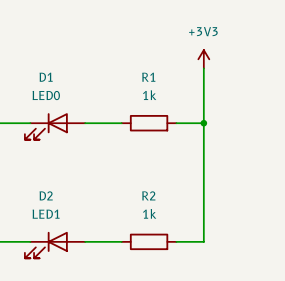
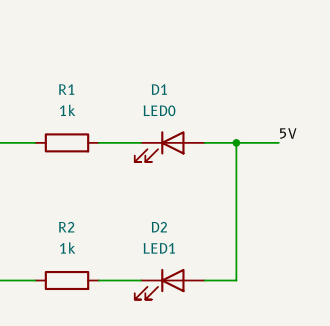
power symbol: +3V3 (203, 59) -> none
wire: (203, 68) (203, 123) -> (278, 142) (236, 142)
label: none -> 5V (288, 133)
R1 position: (149, 123) -> (67, 142)
D1 position: (55, 126) -> (169, 146)
R2 position: (149, 241) -> (67, 280)
D2 position: (55, 245) -> (169, 284)

